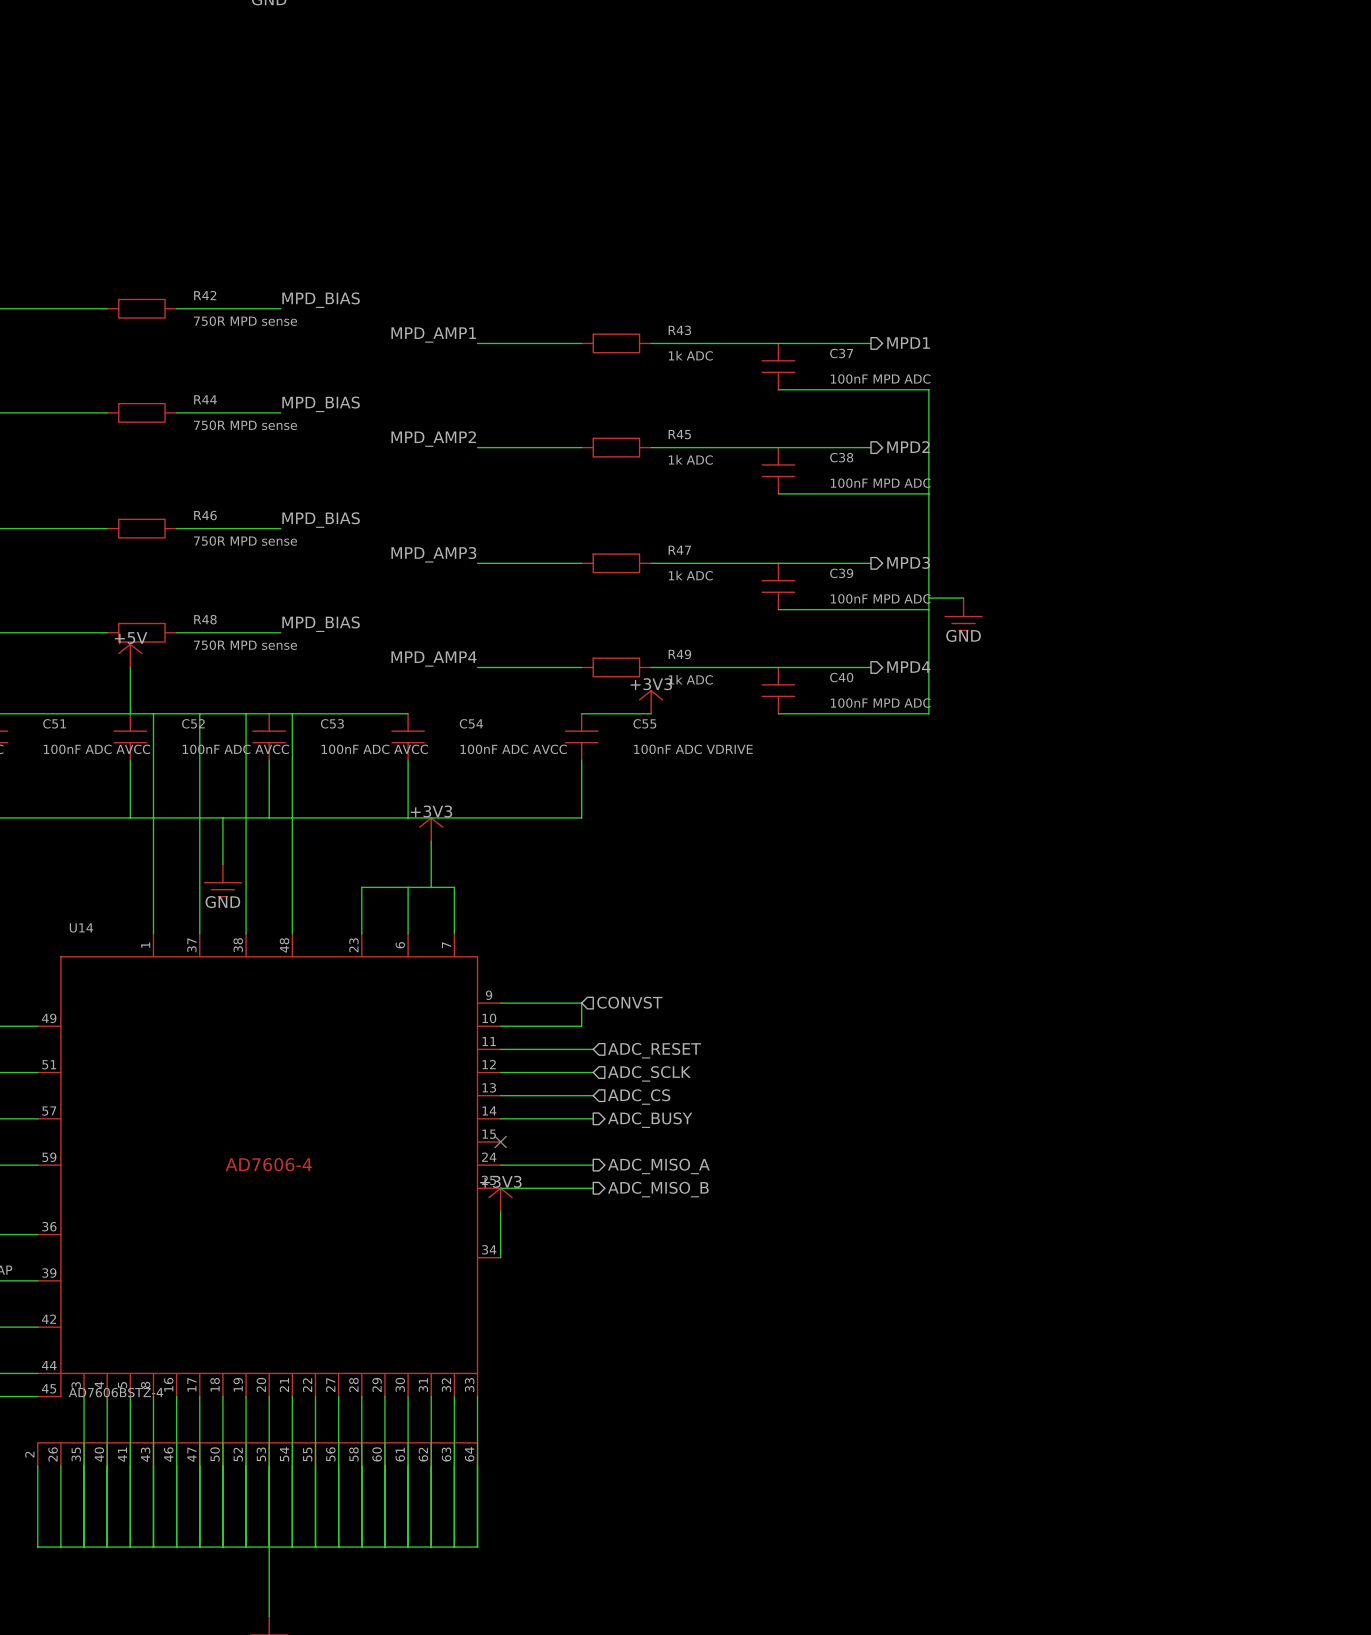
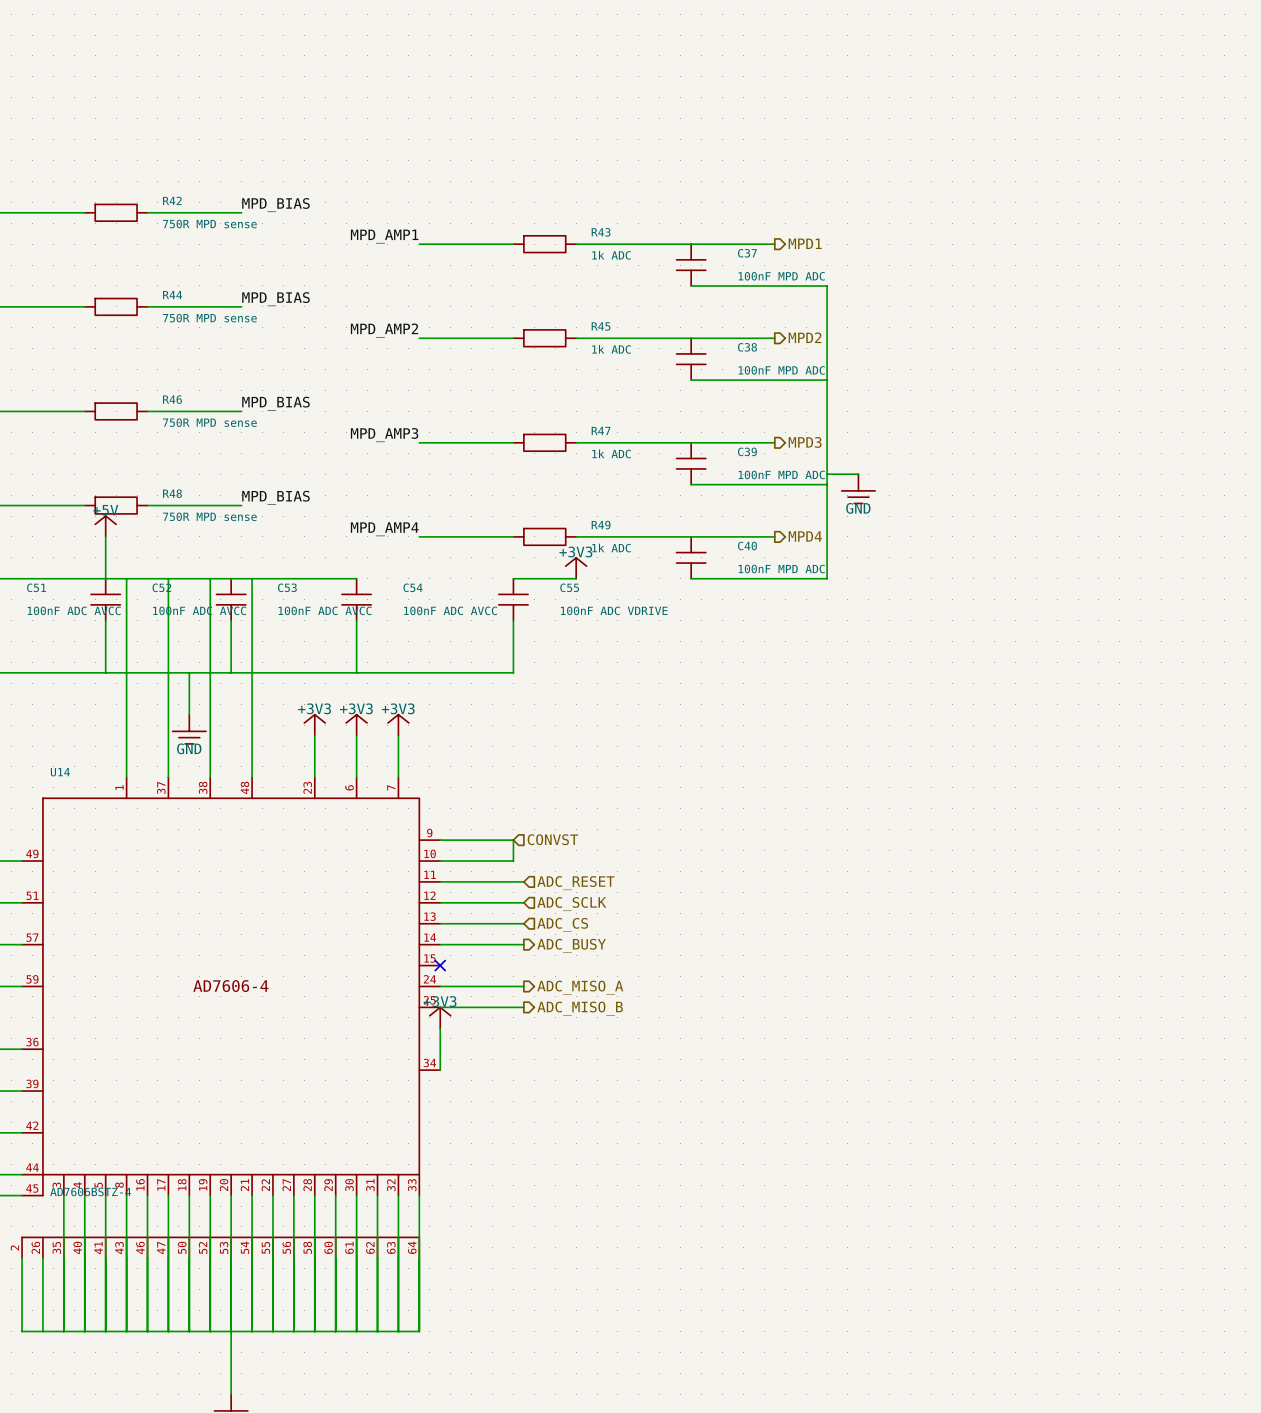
power symbol: +3V3 (431, 829) -> none
wire: (431, 841) (431, 887) -> none
power symbol: none -> +3V3 (314, 725)
power symbol: none -> +3V3 (356, 725)
power symbol: none -> +3V3 (398, 725)
wire: (361, 887) (454, 887) -> none

